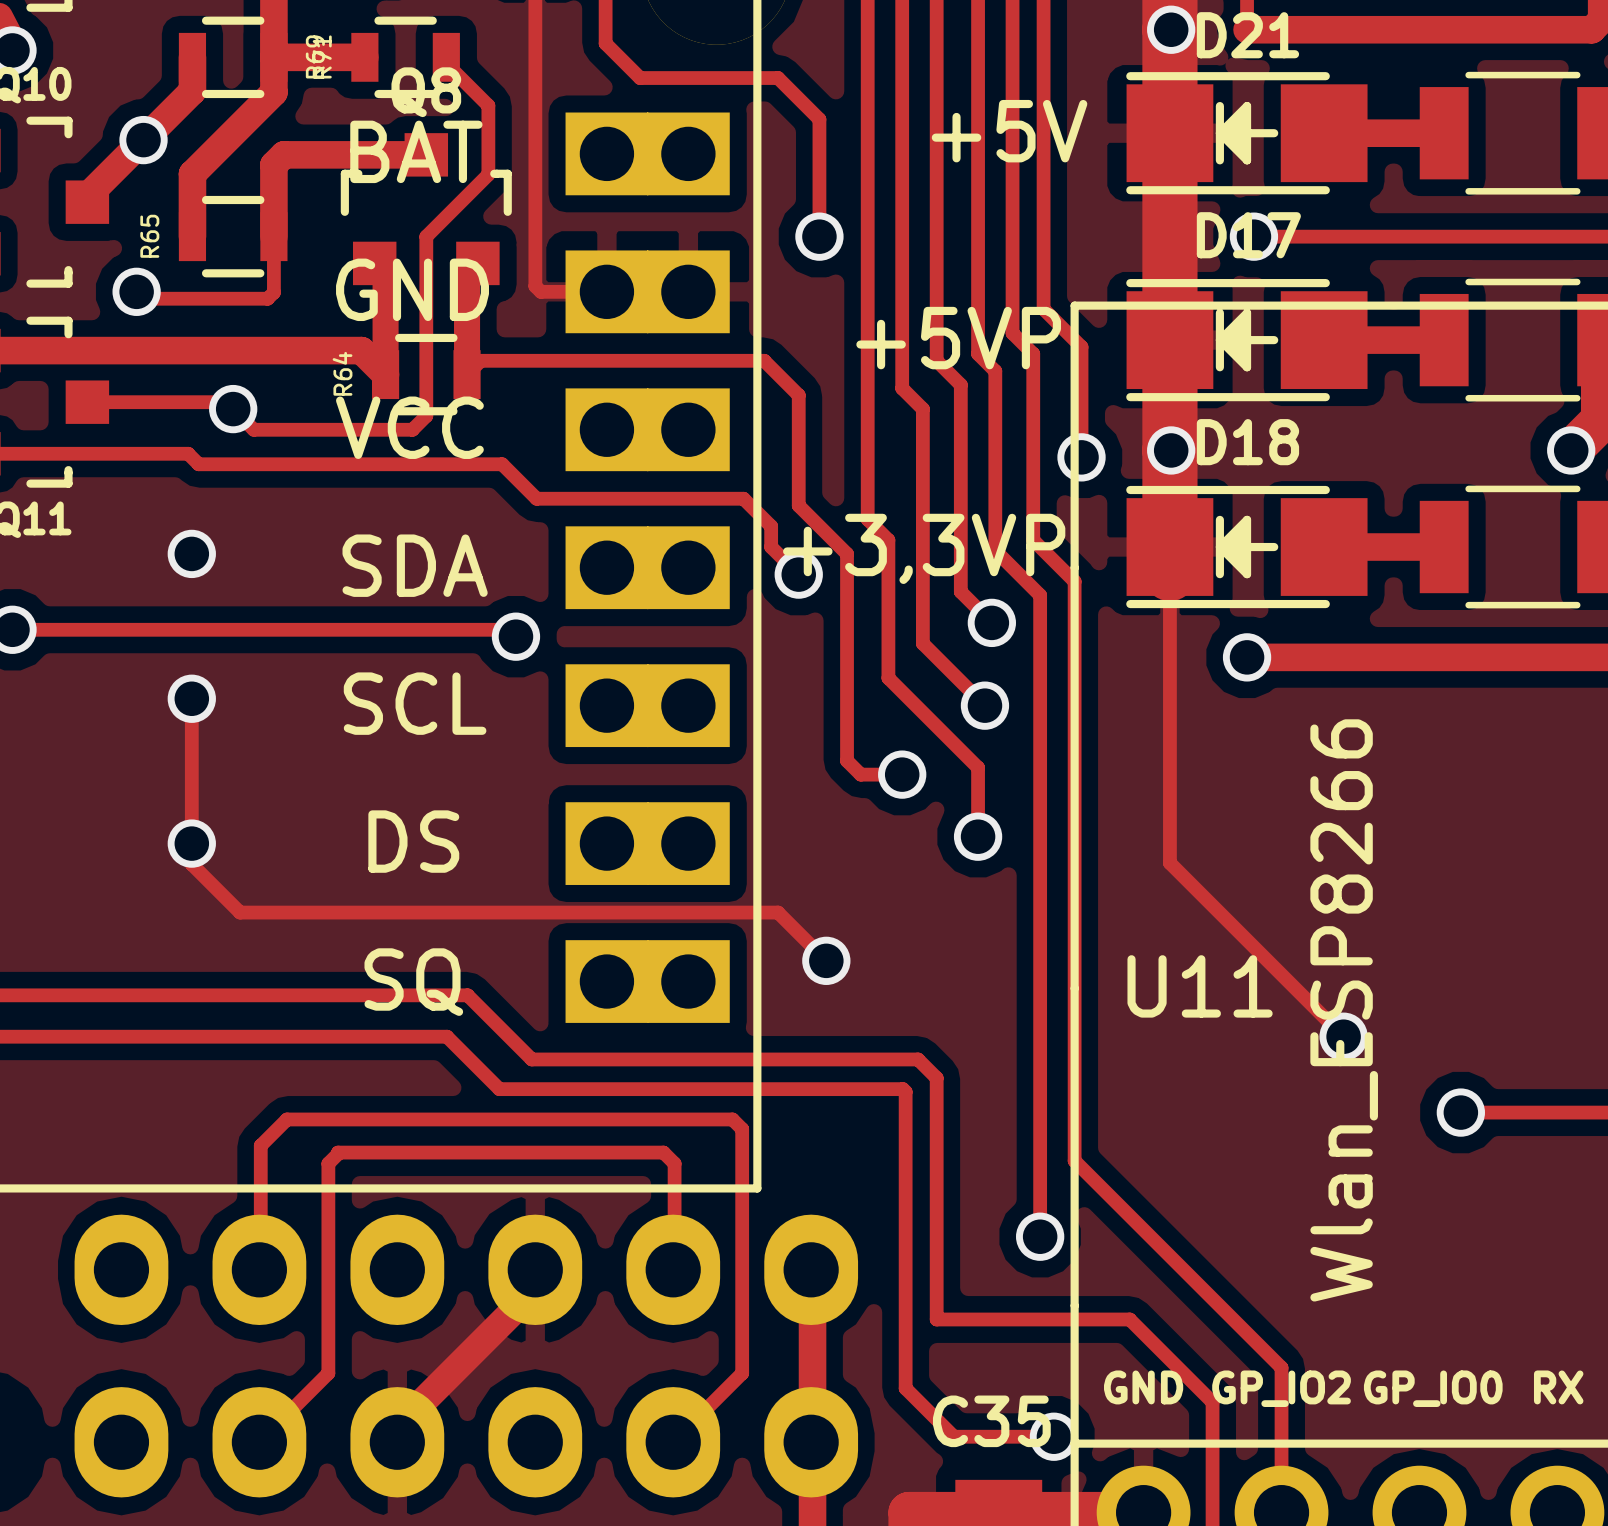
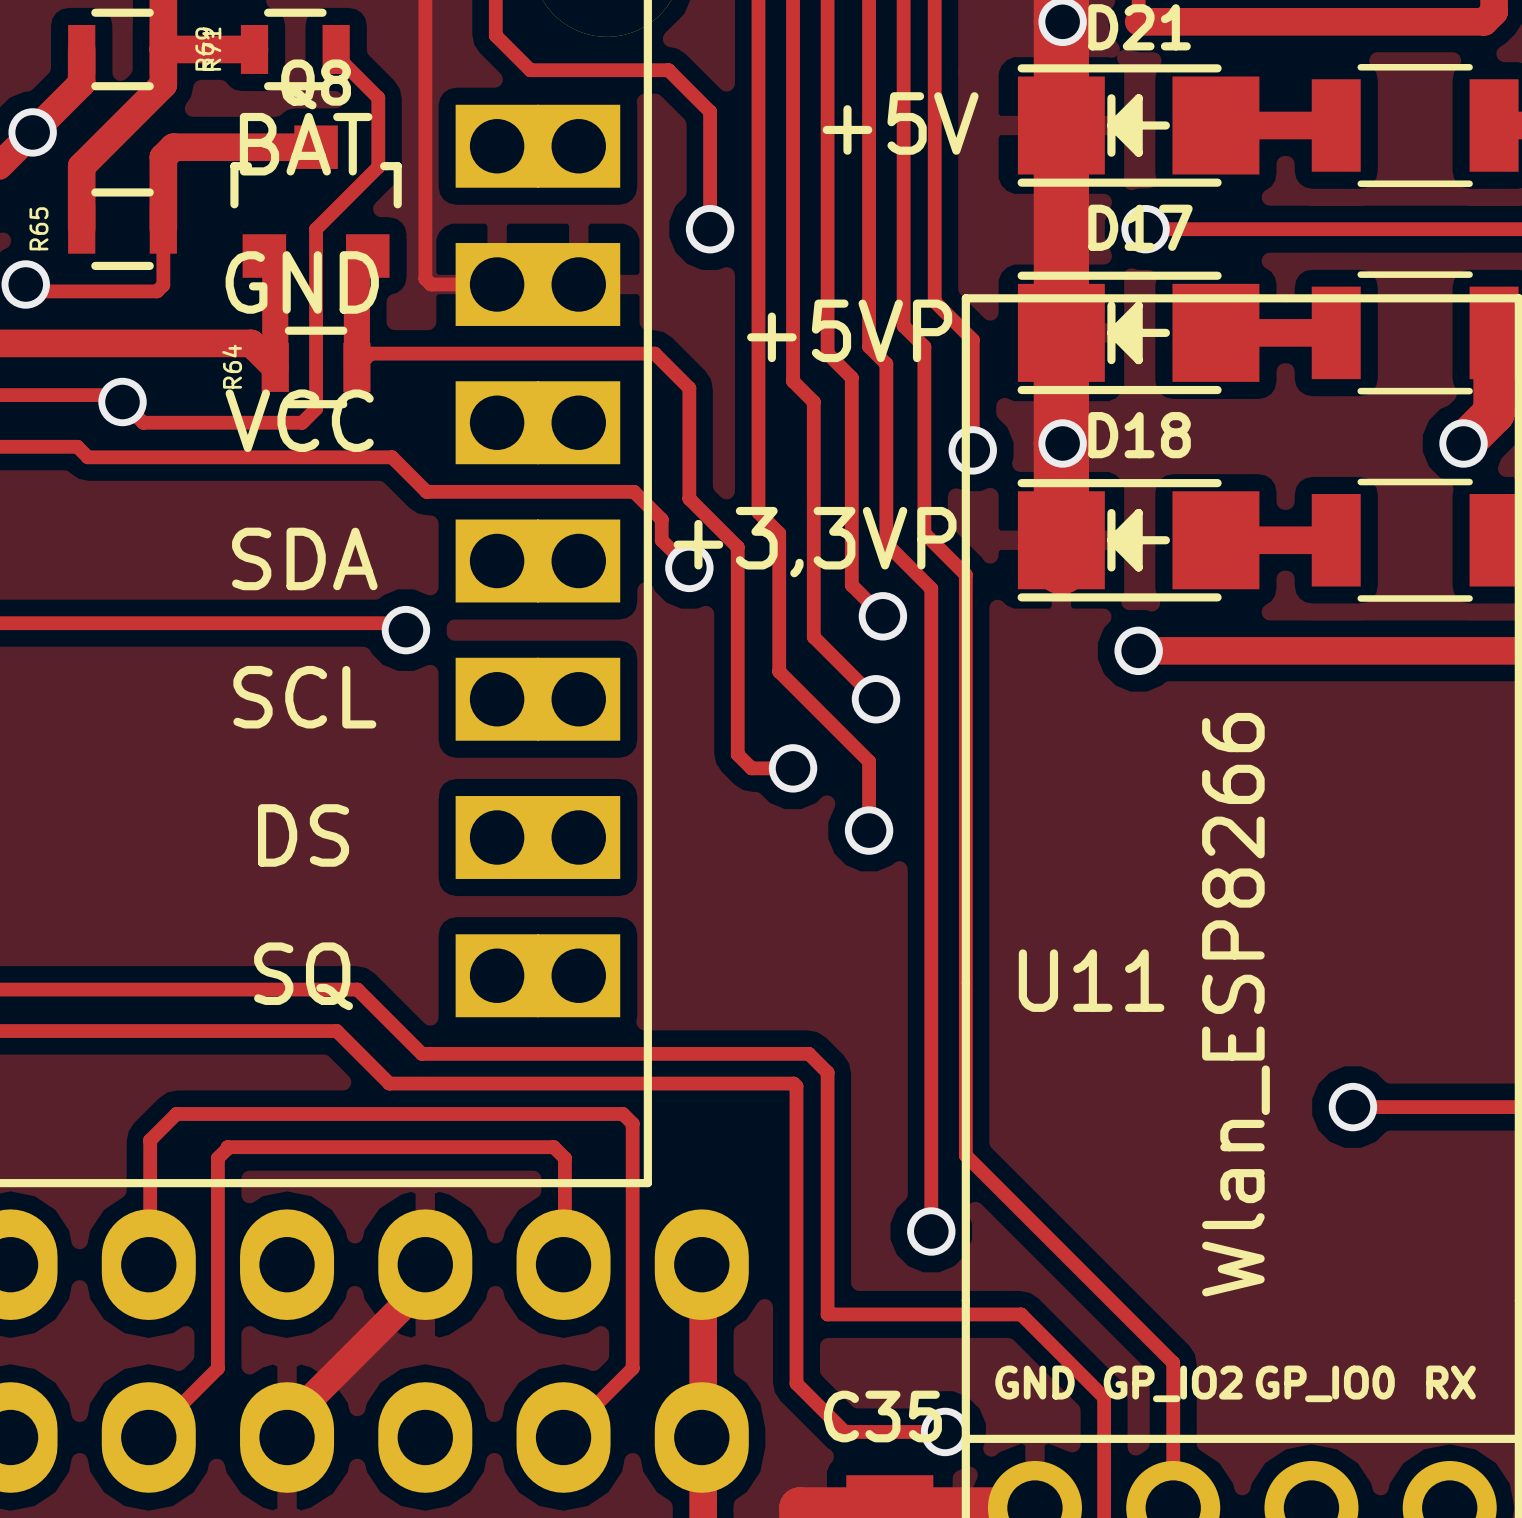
track: (1169, 547) (1169, 863) (1343, 1036) -> none
via: (191, 553) -> none
track: (191, 698) (191, 864) (240, 912) (778, 912) (826, 960) -> none
via: (191, 698) -> none
via: (191, 843) -> none
via: (826, 960) -> none
via: (1343, 1036) -> none

